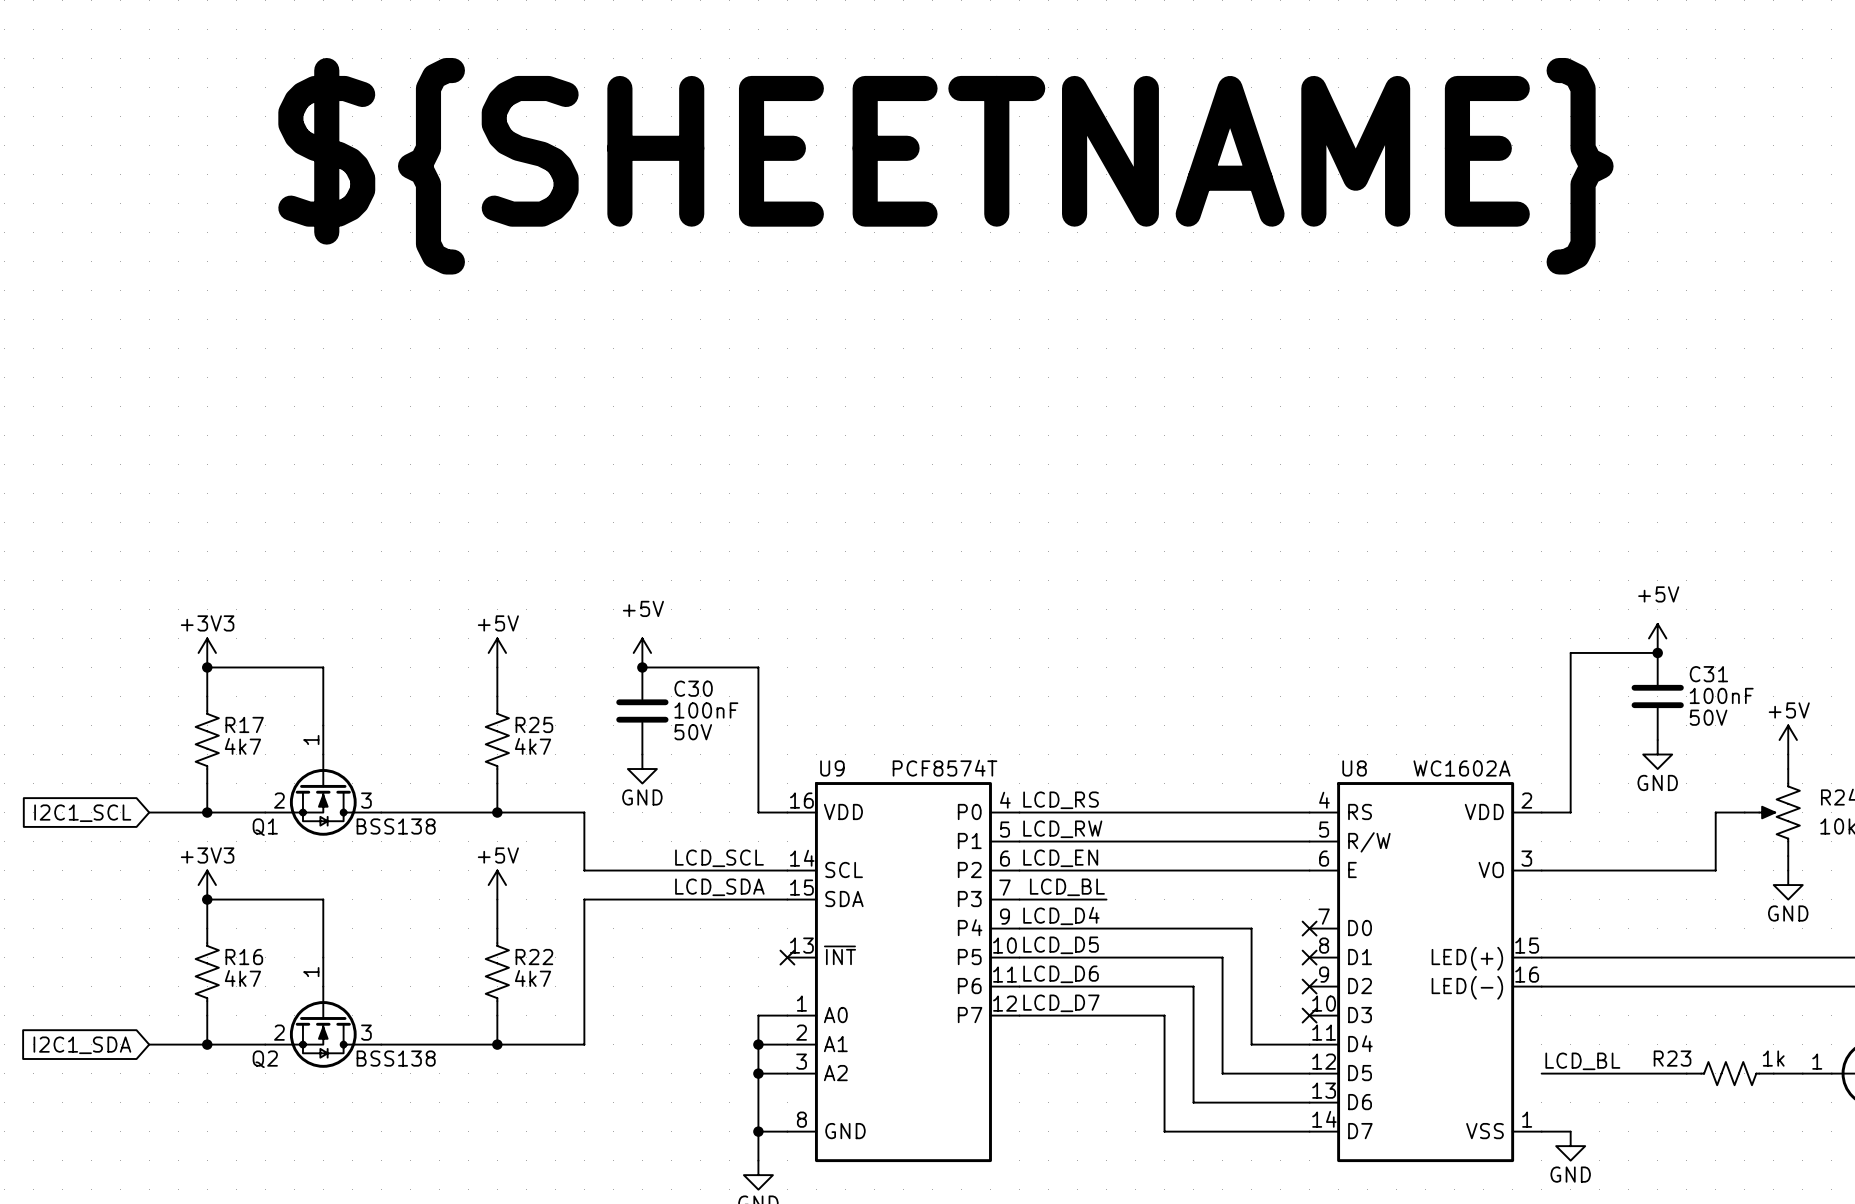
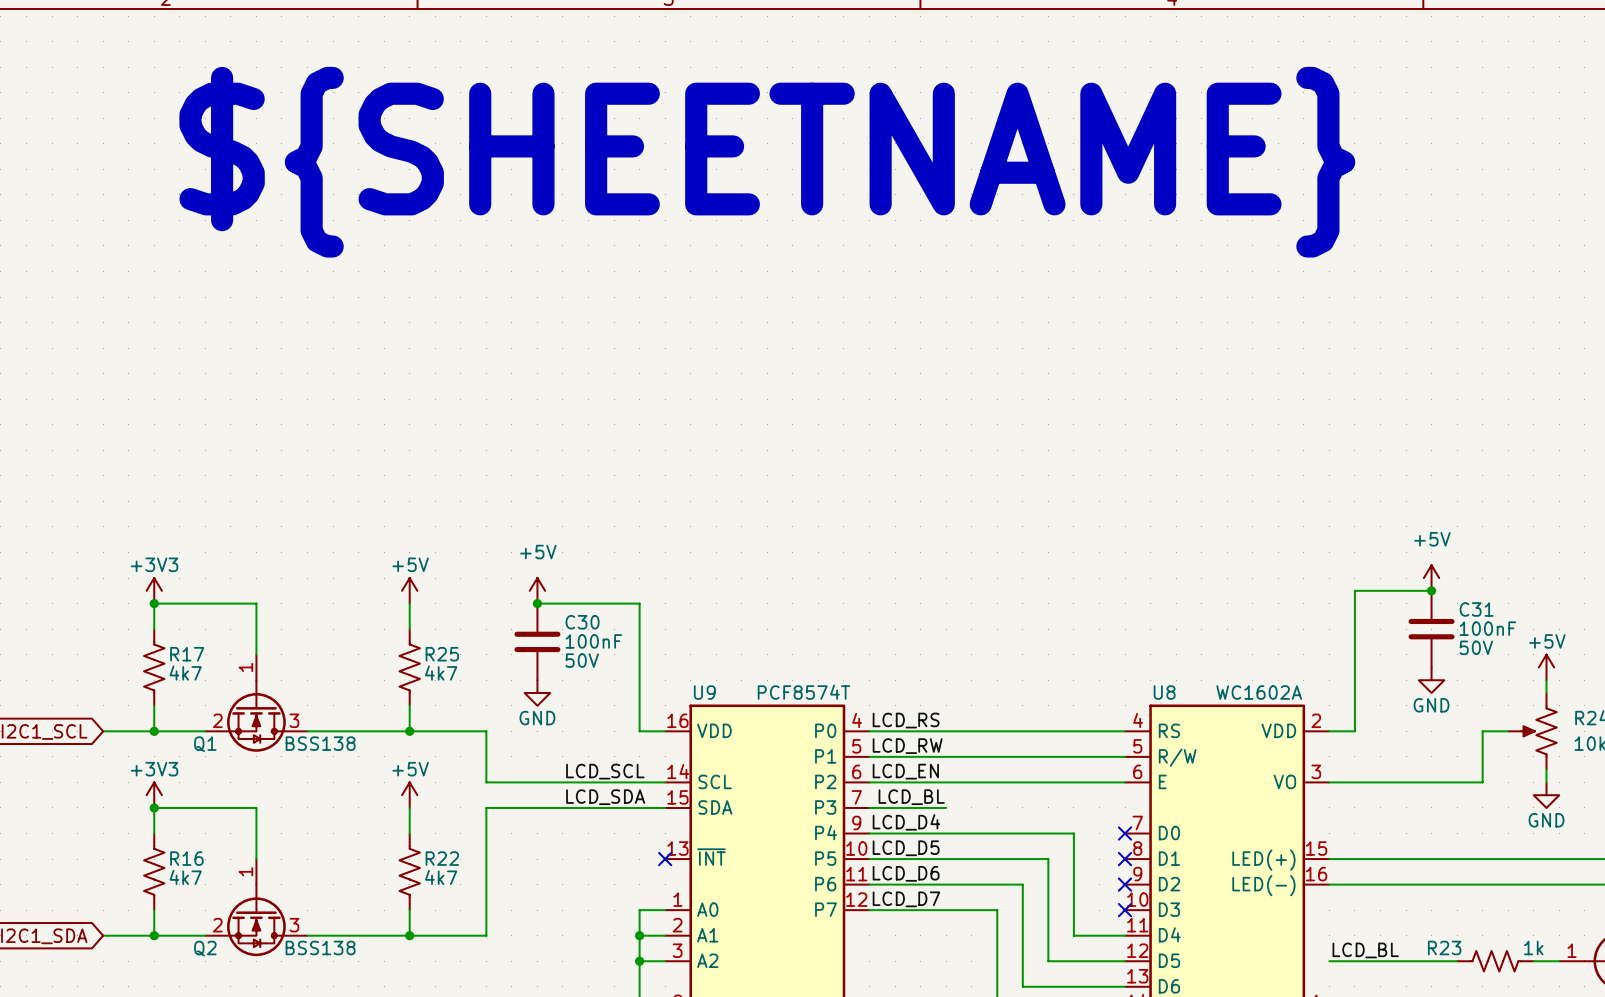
text position: ${SHEETNAME} (945, 166) -> ${SHEETNAME} (767, 162)

